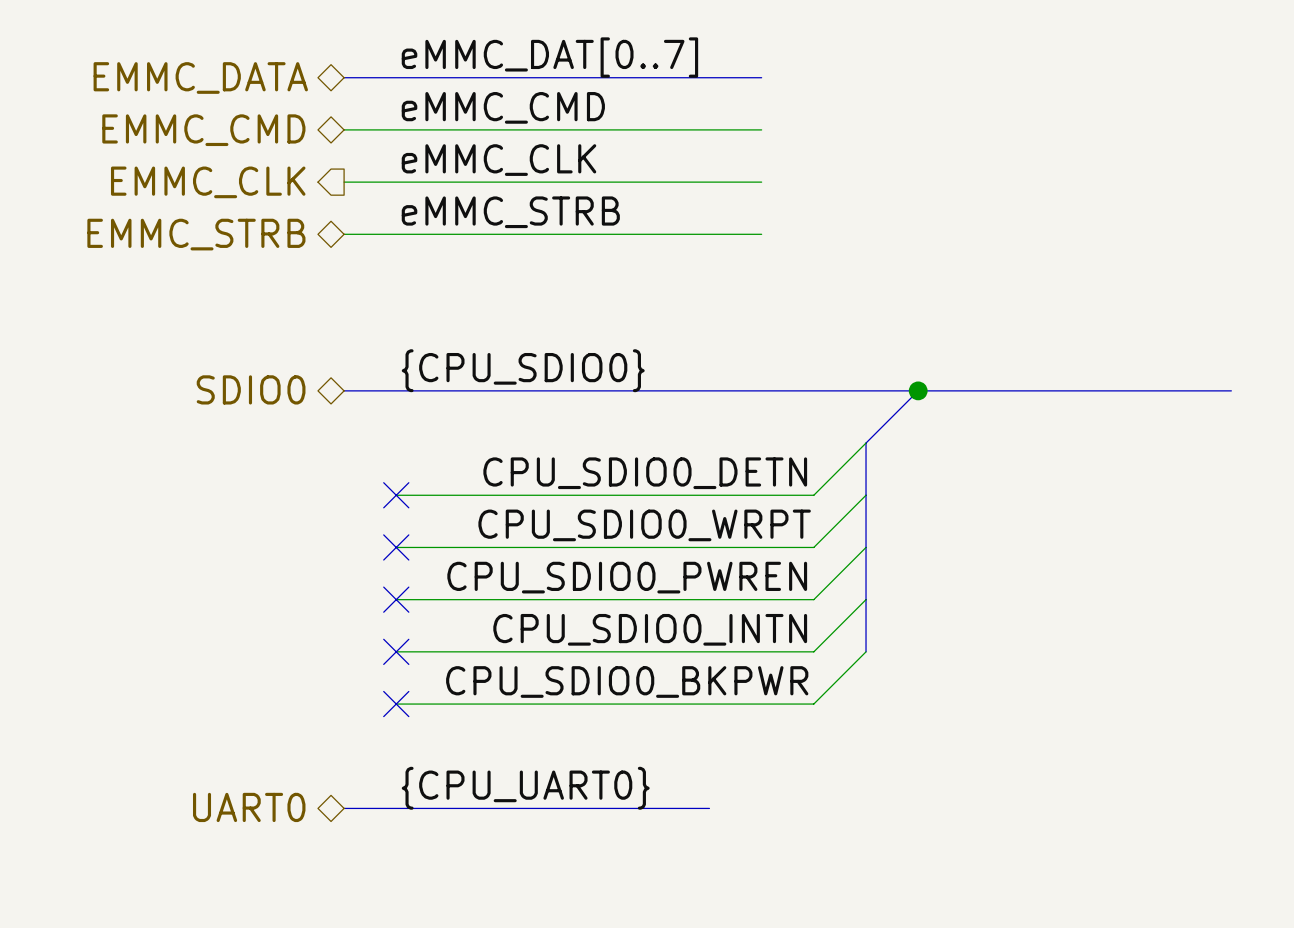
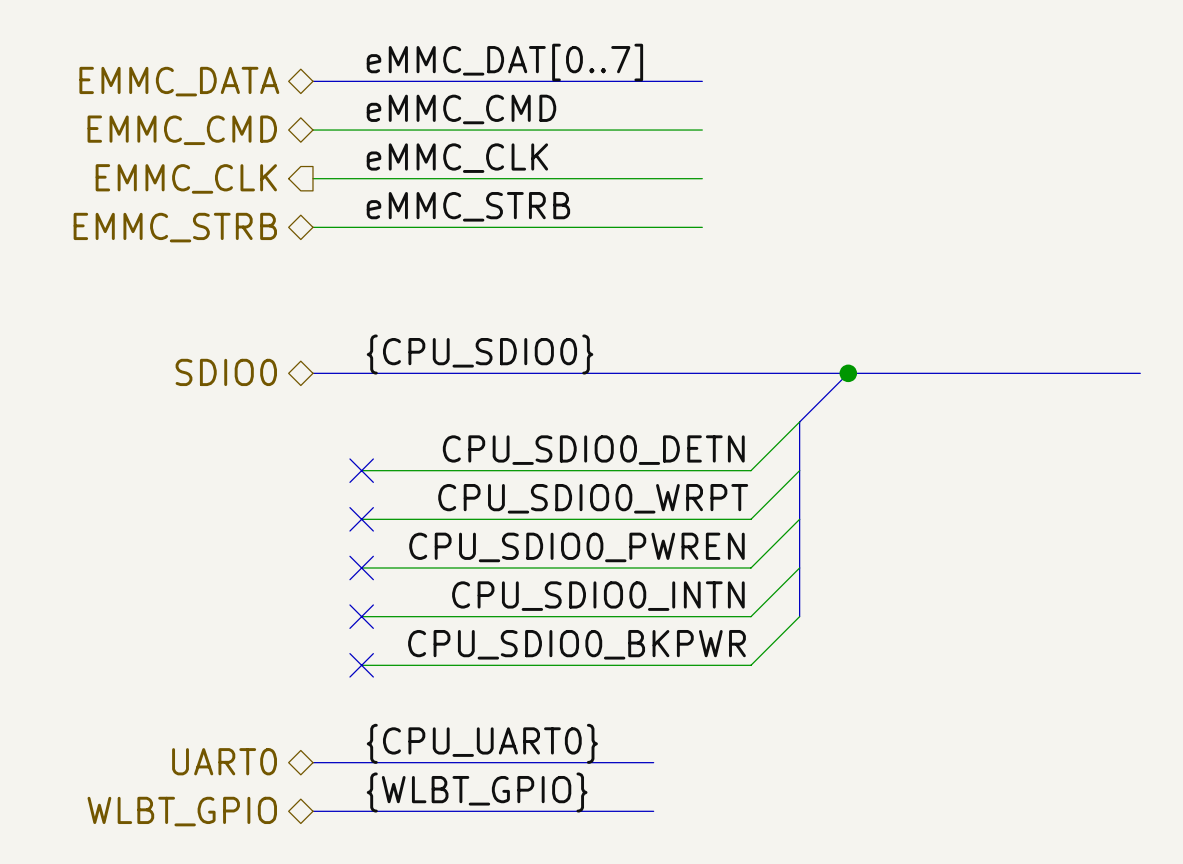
label: none -> {WLBT_GPIO} (477, 792)
hierarchical label: none -> WLBT_GPIO (182, 811)
bus: none -> (312, 811) (653, 811)

